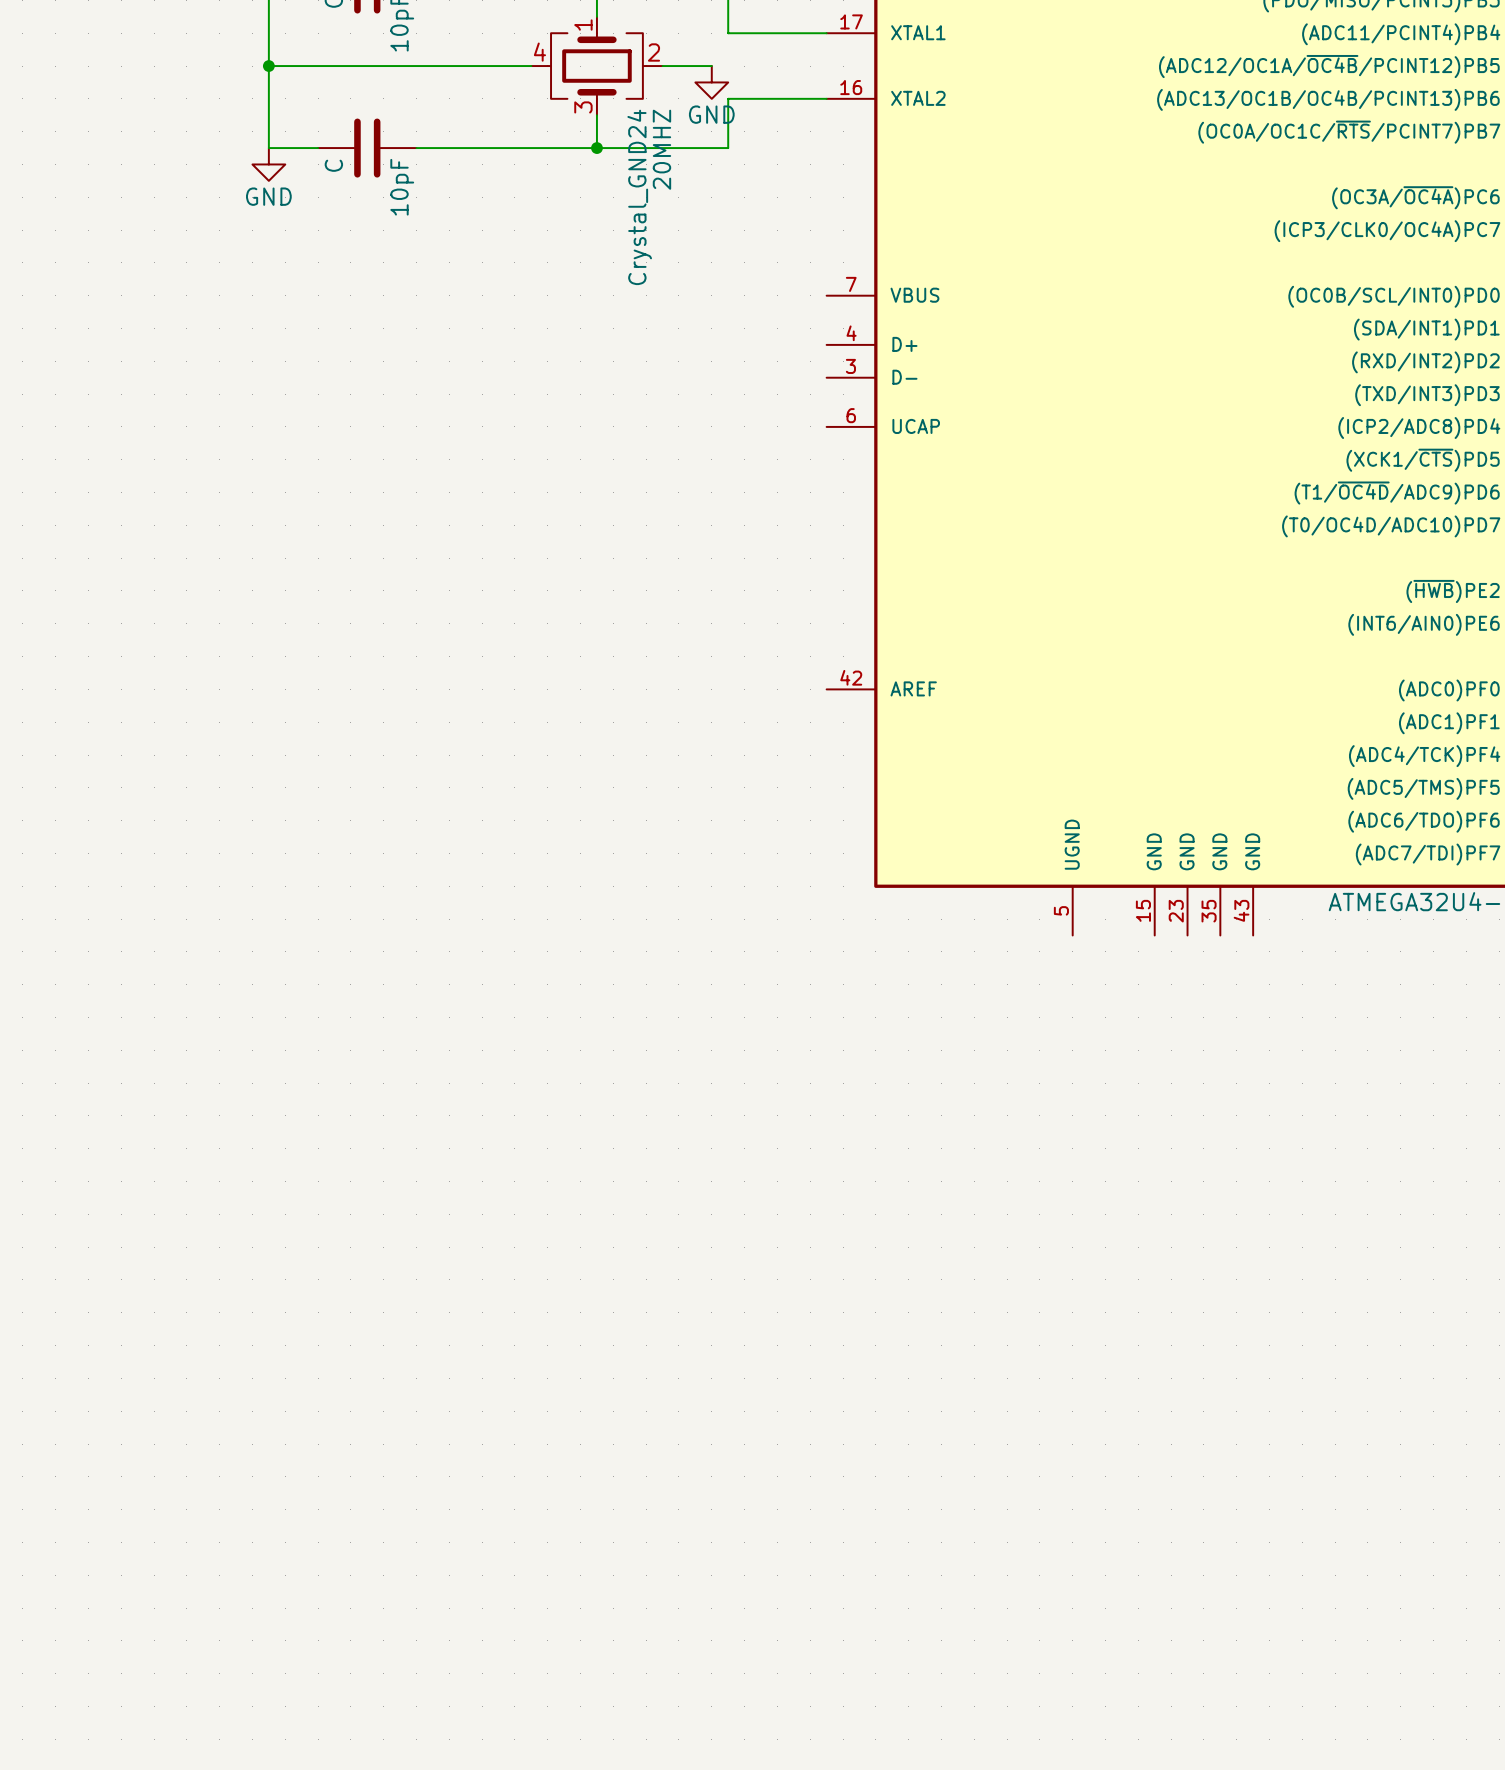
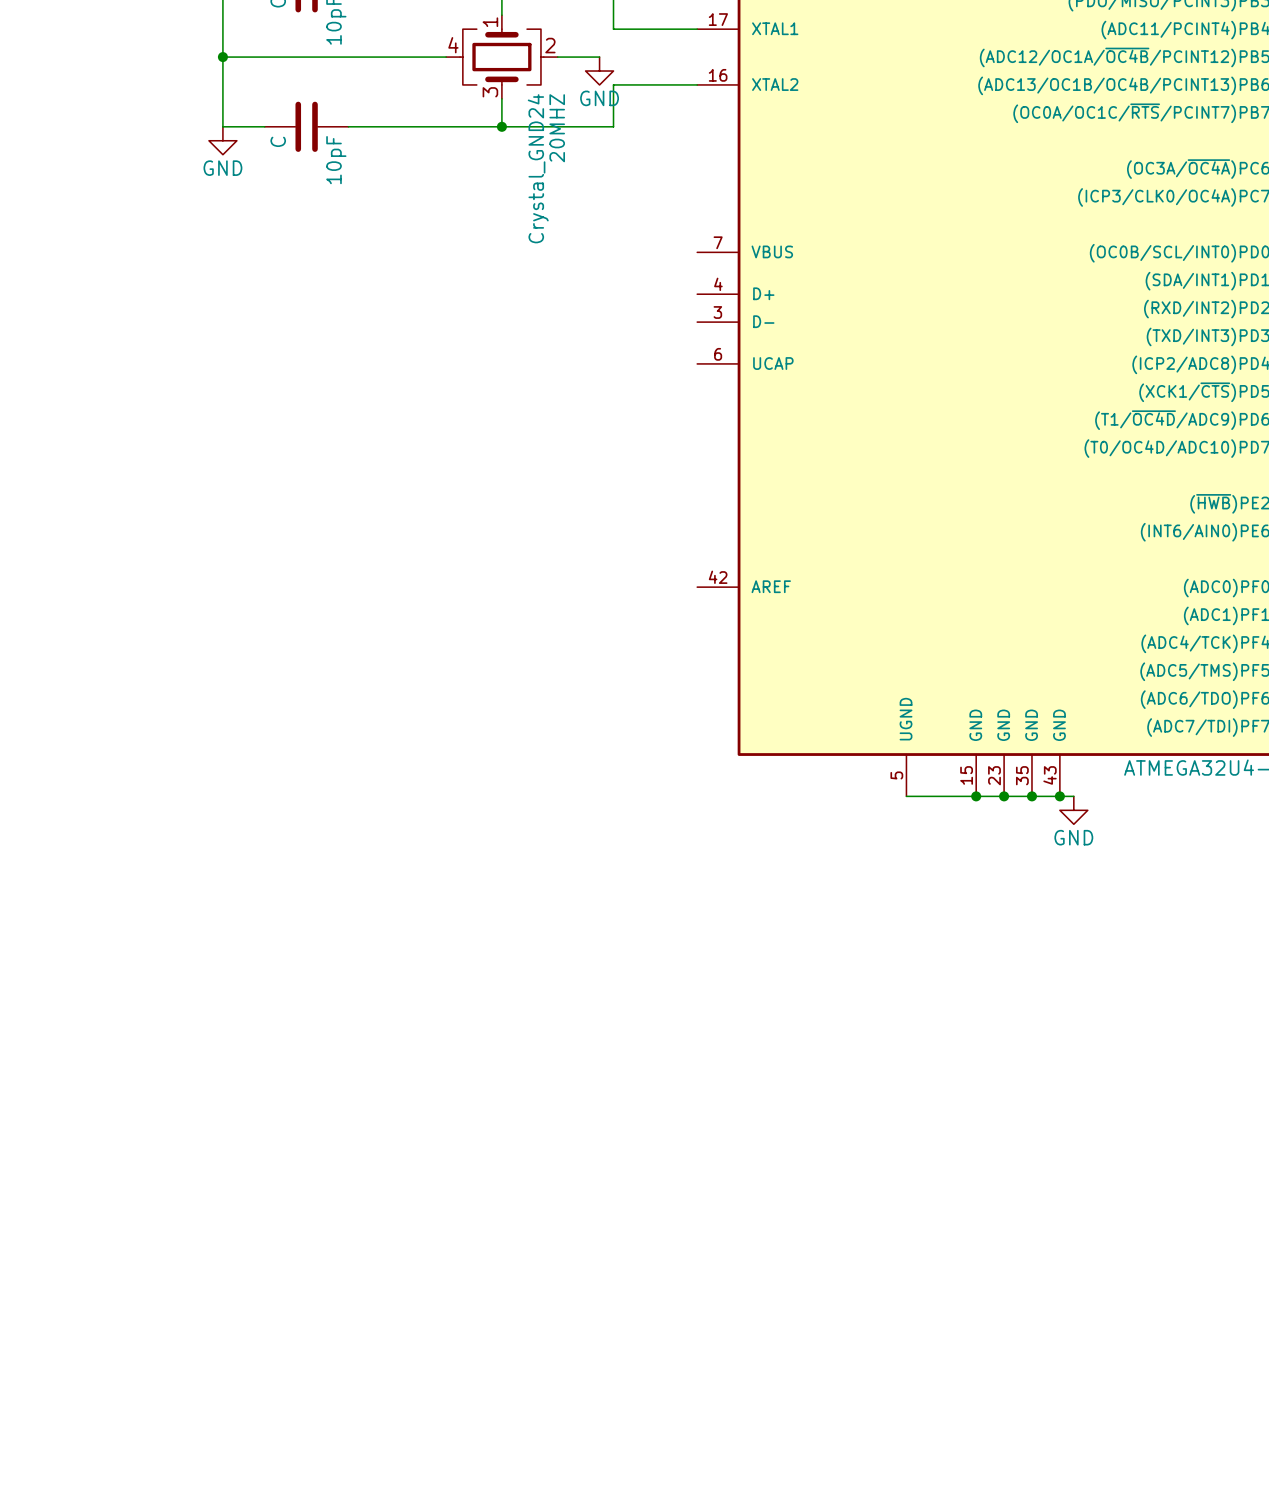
wire: none -> (906, 796) (1073, 796)
junction: none -> (976, 796)
junction: none -> (1004, 796)
junction: none -> (1031, 796)
junction: none -> (1059, 796)
power symbol: none -> GND (1073, 810)

